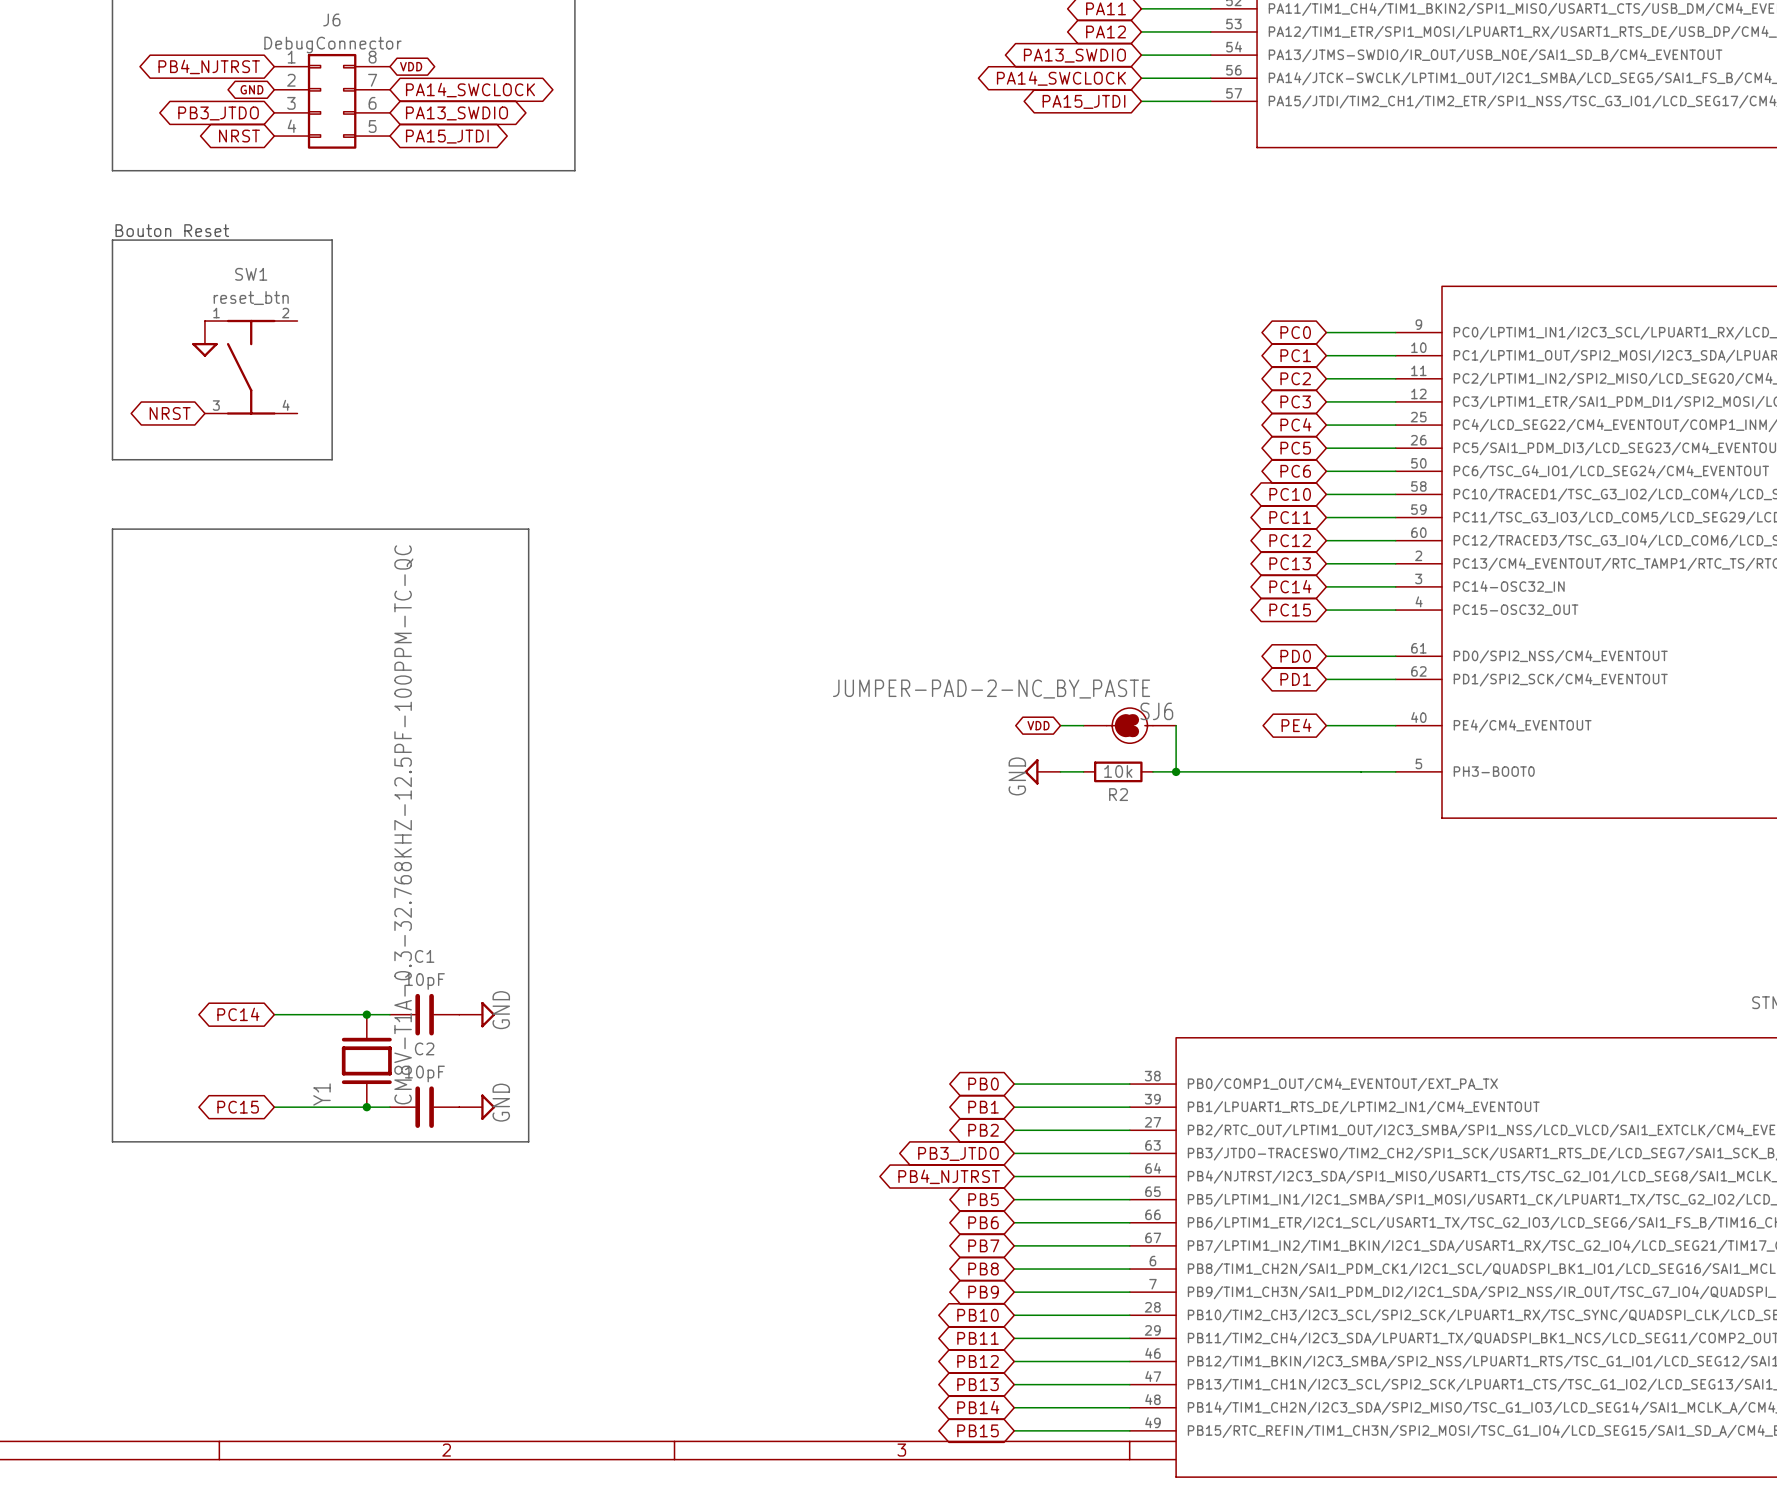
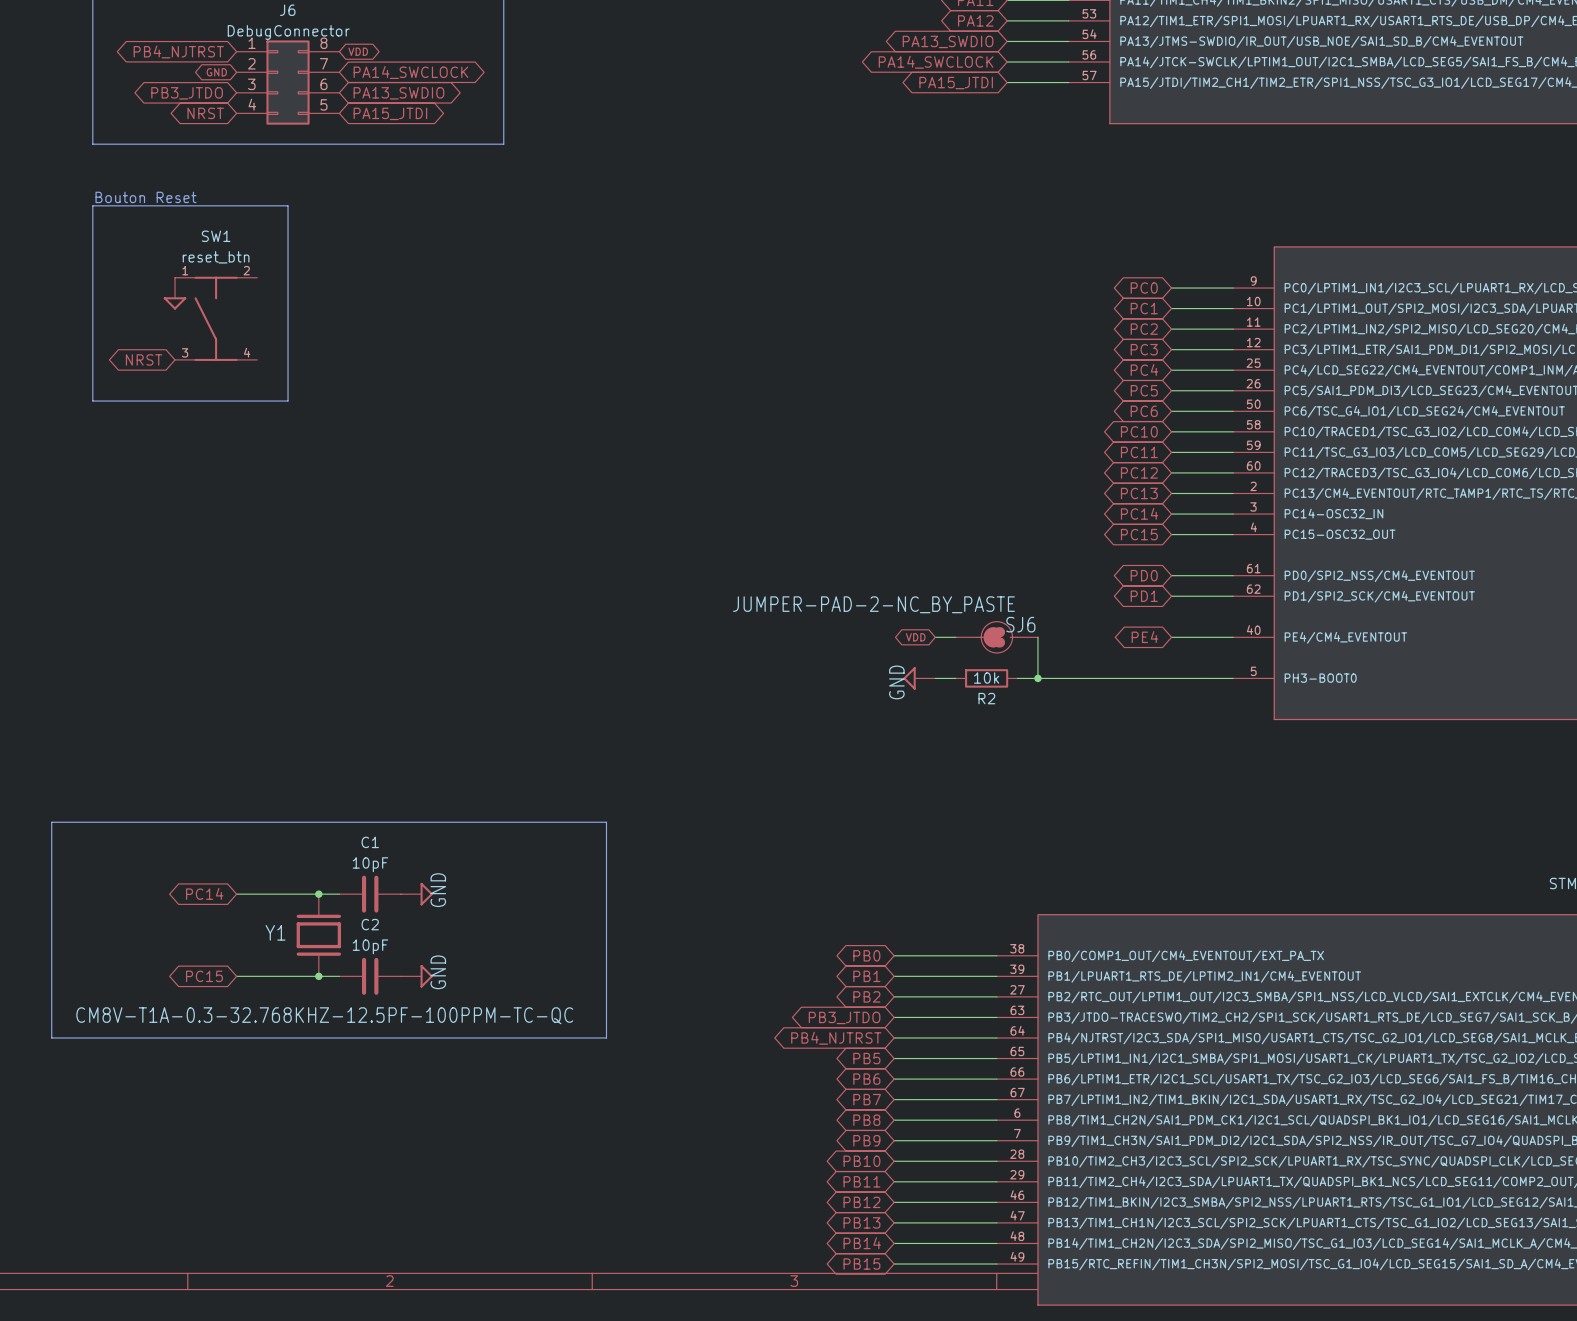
line: (112, 529) (528, 529) (528, 1141) (112, 1141) (112, 529) -> none
Y1 value rotation: 0° (403, 824) -> 90° clockwise (324, 1015)
line: none -> (51, 822) (606, 822) (606, 1037) (51, 1037) (51, 822)
Y1 name rotation: 0° (321, 1094) -> 90° clockwise (275, 932)

